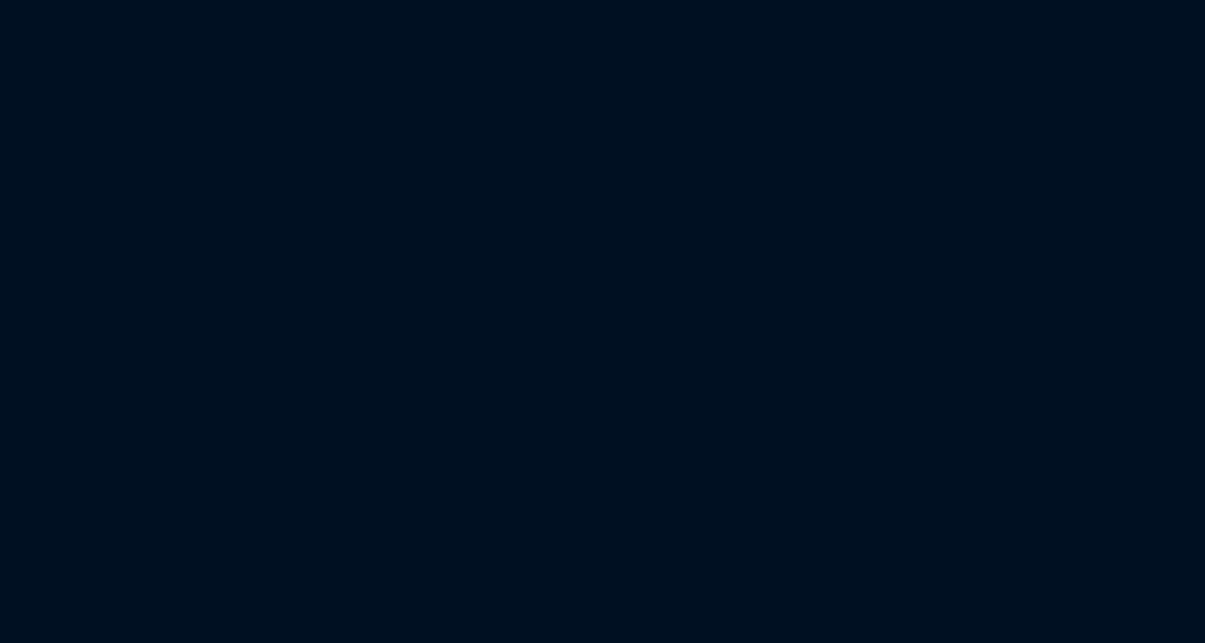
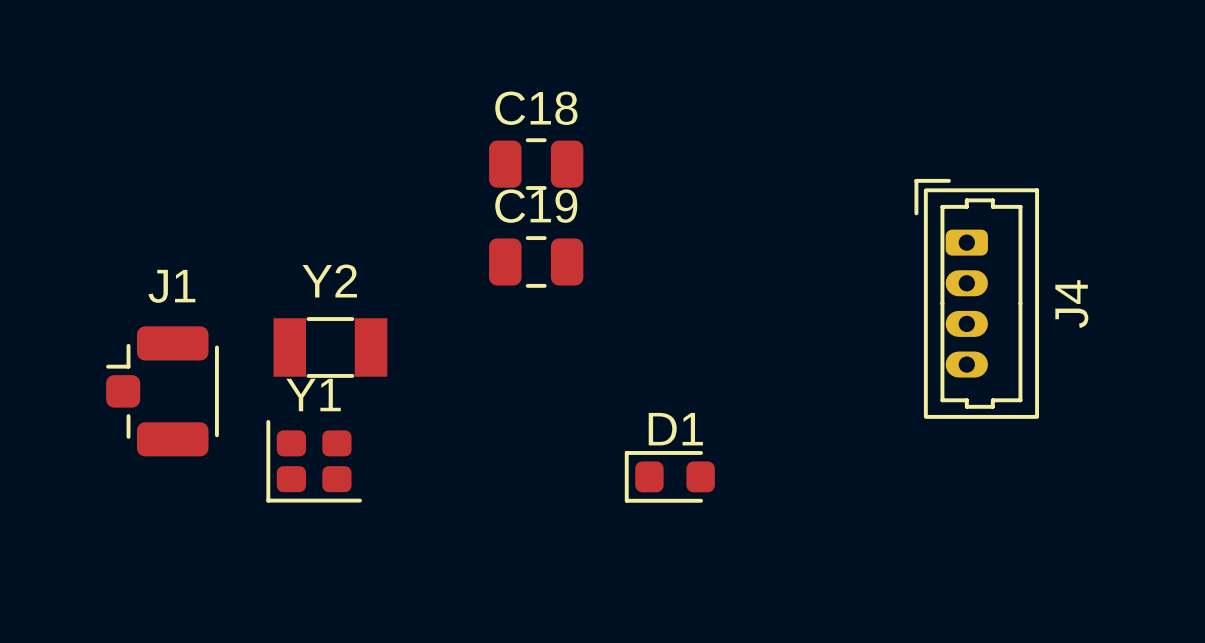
C18: none -> (536, 164)
C19: none -> (536, 261)
J4: none -> (976, 298)
Y2: none -> (330, 347)
J1: none -> (162, 391)
Y1: none -> (314, 461)
D1: none -> (669, 476)

